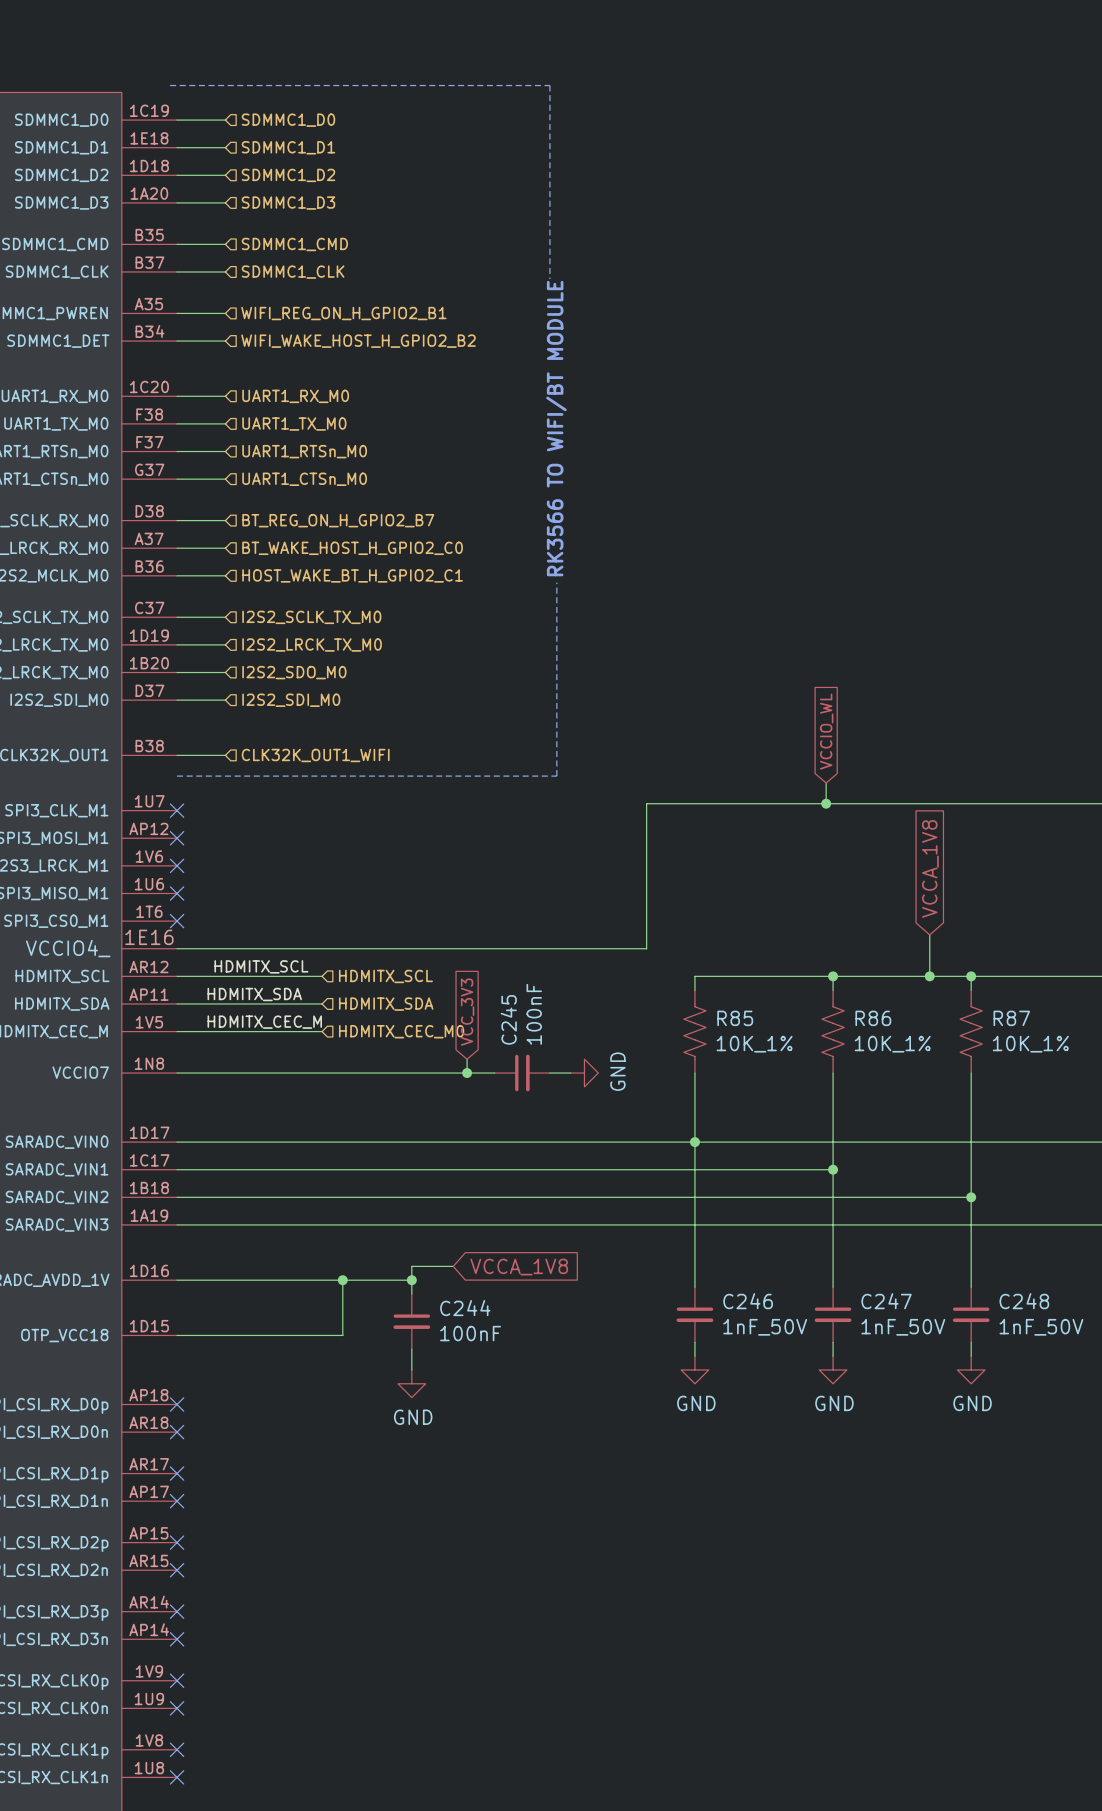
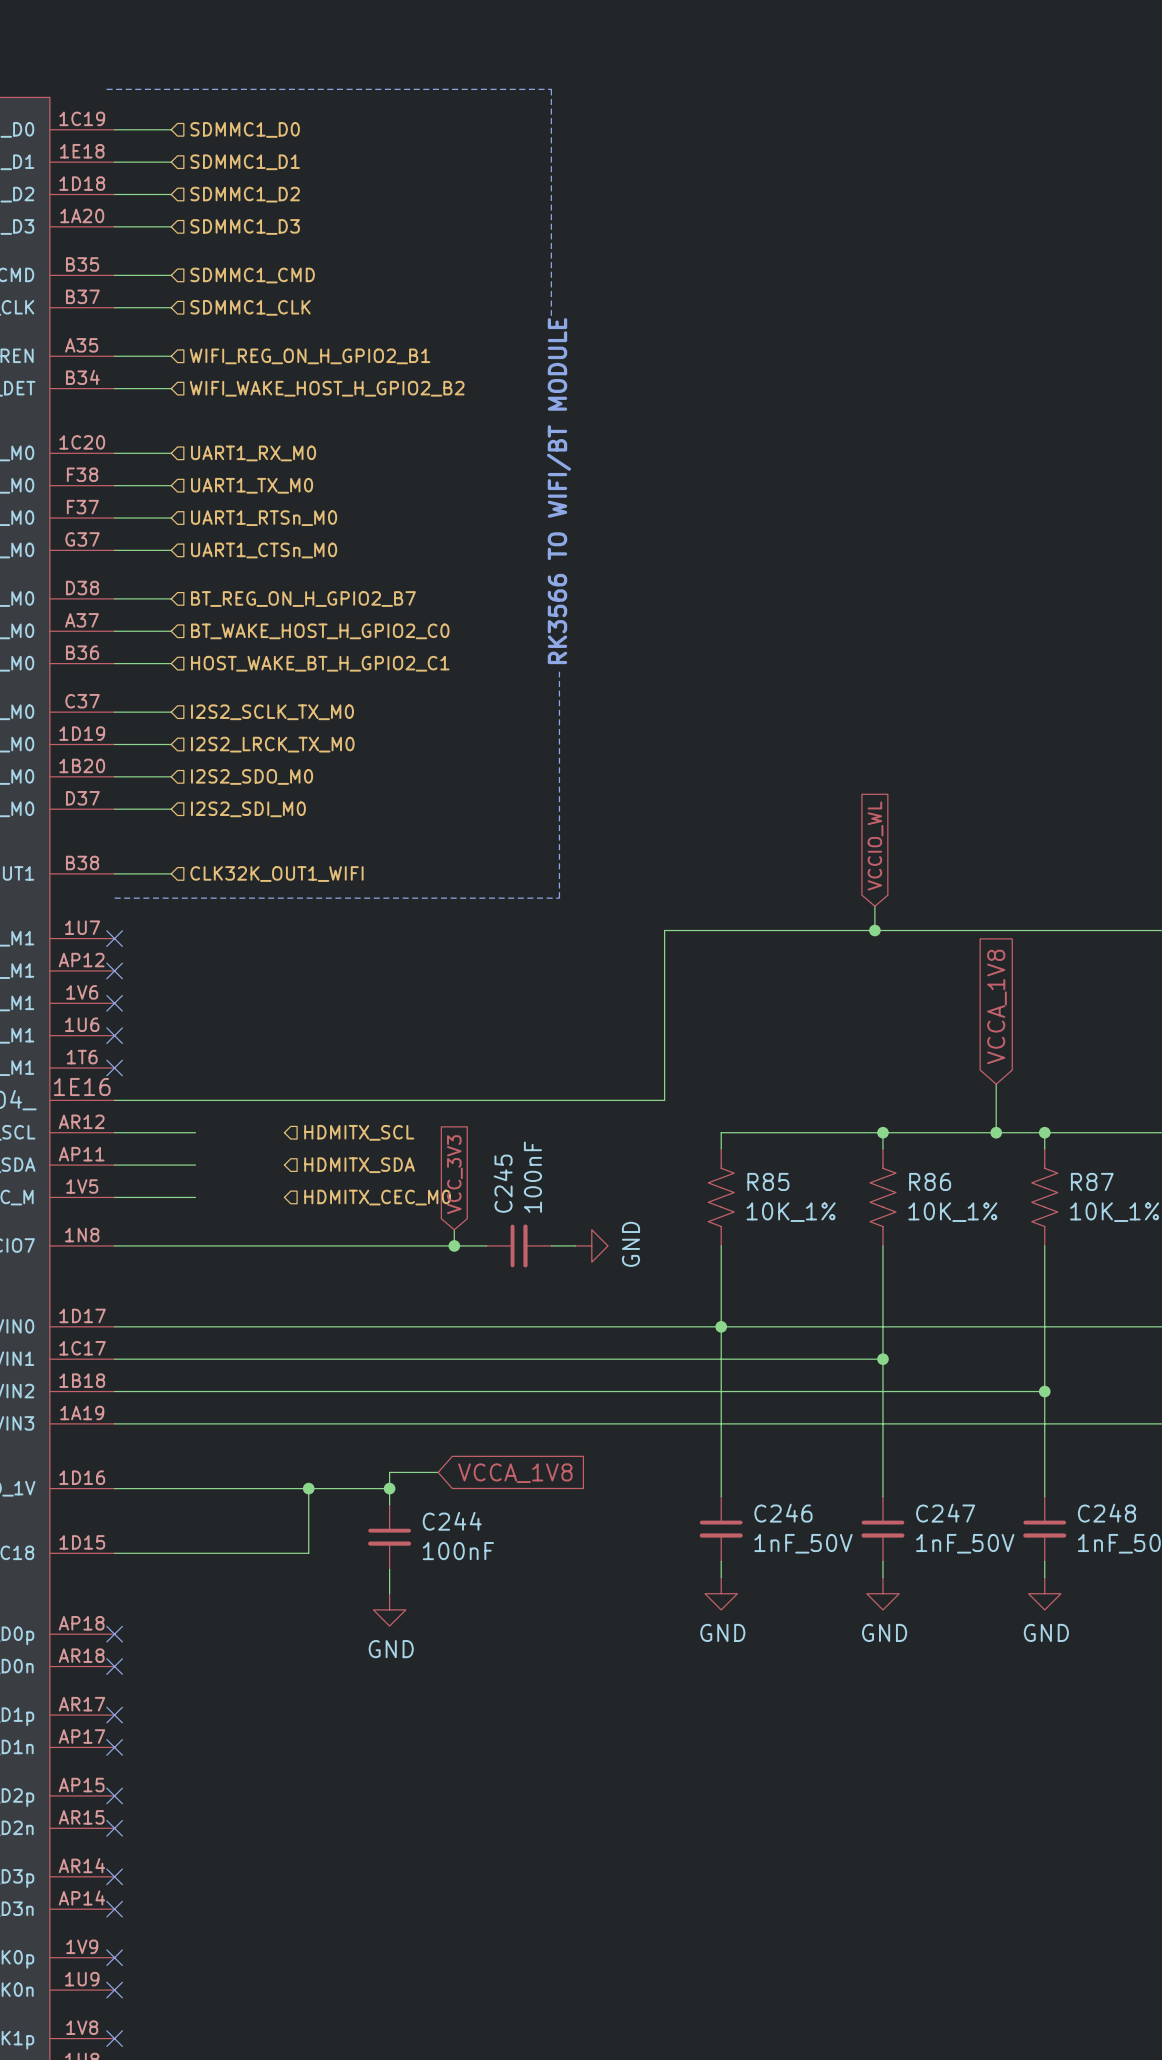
label: HDMITX_SCL (261, 966) -> none
wire: (246, 976) (322, 976) -> none
label: HDMITX_SDA (254, 994) -> none
wire: (246, 1003) (322, 1003) -> none
label: HDMITX_CEC_M (264, 1022) -> none
wire: (246, 1031) (322, 1031) -> none

